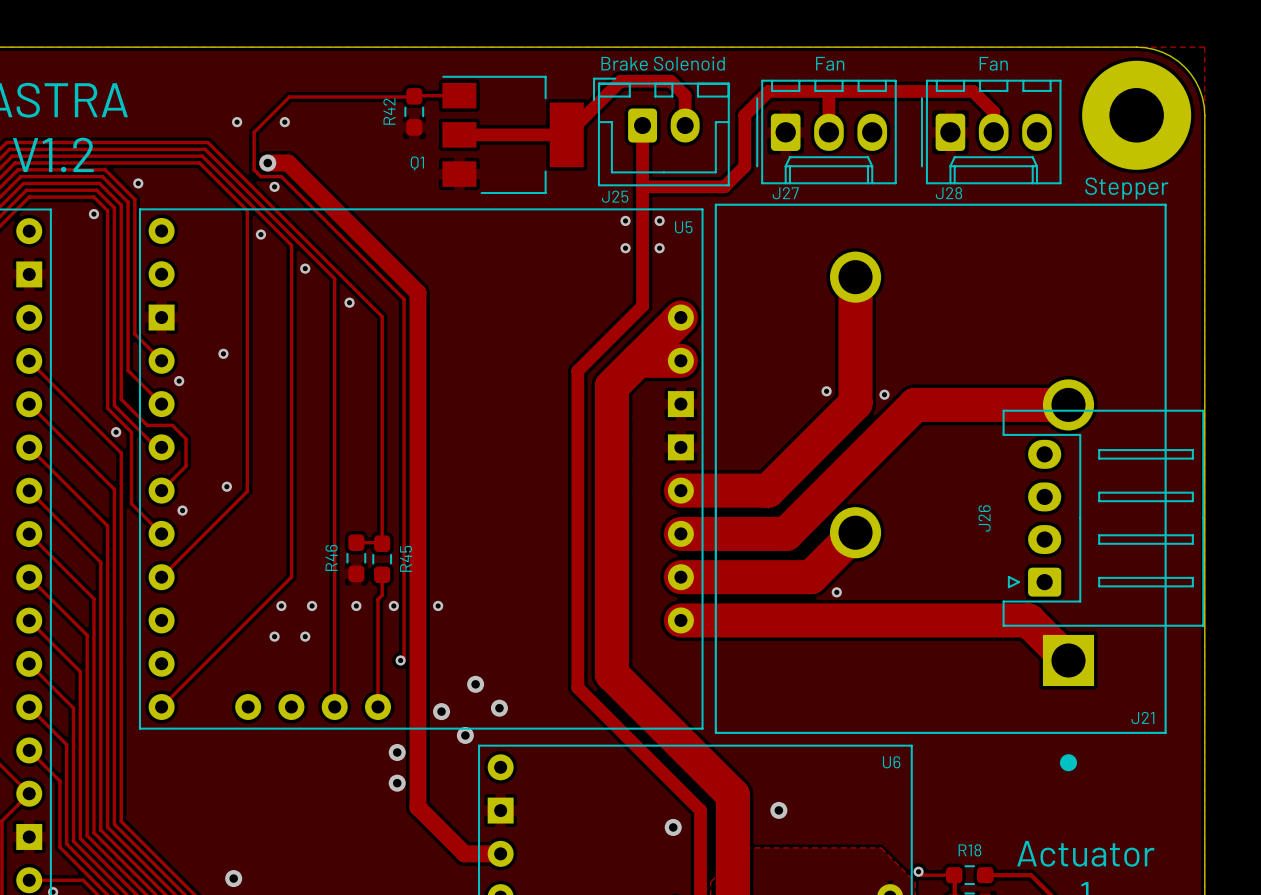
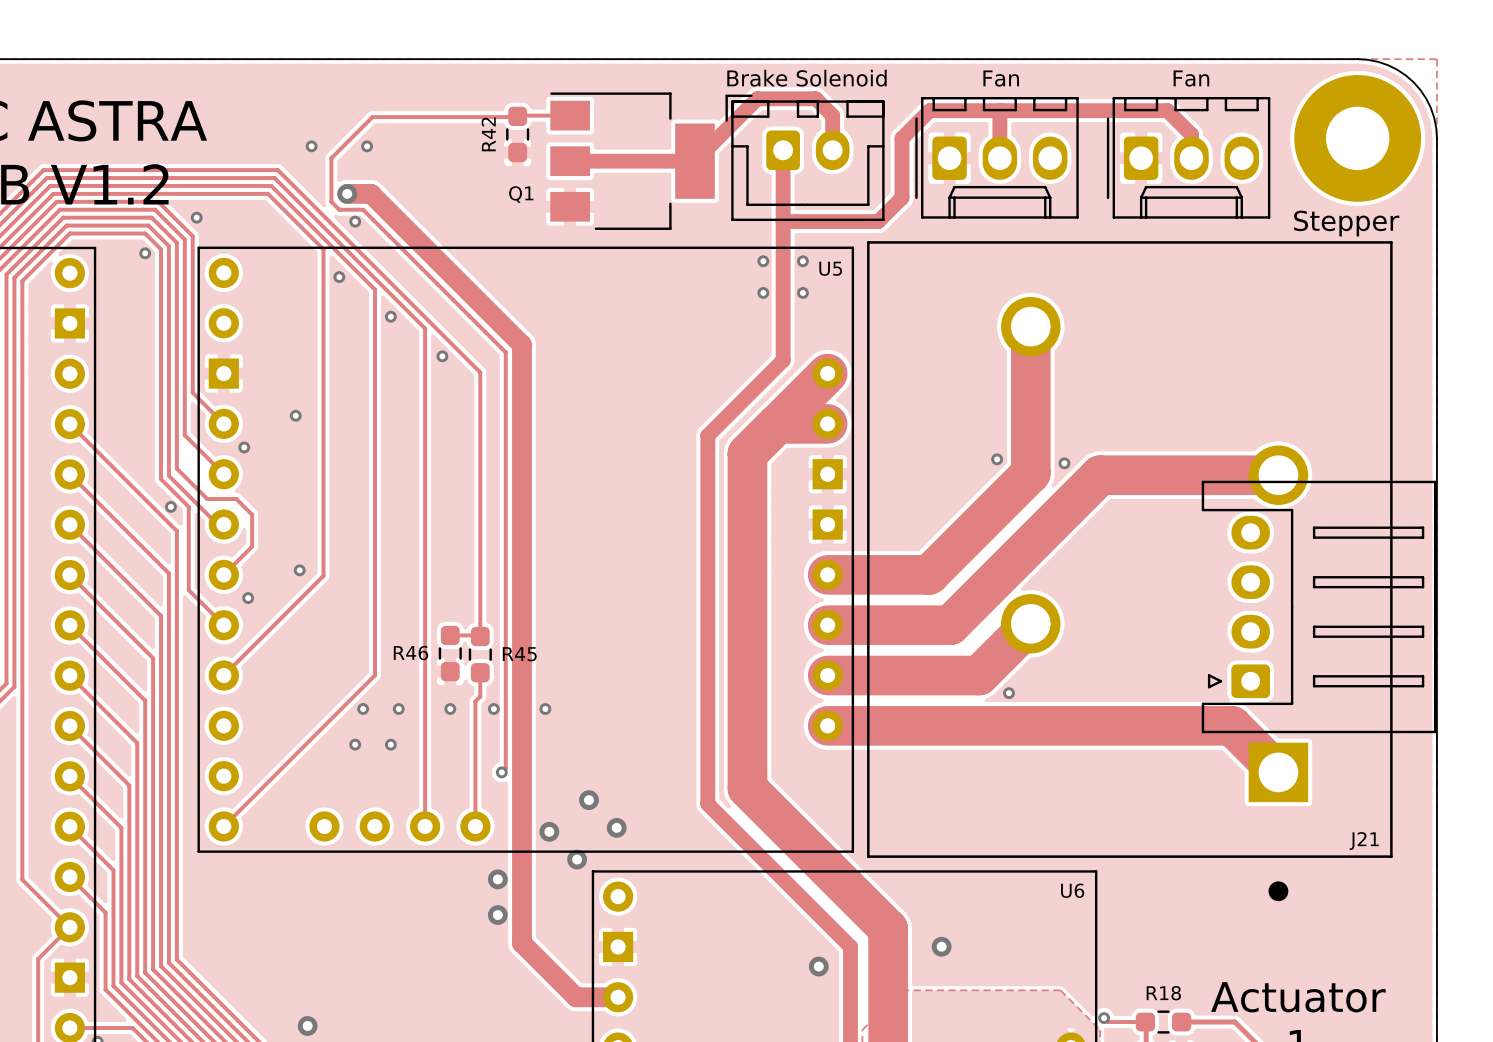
J27 name: J27 (785, 193) -> none
J28 name: J28 (948, 193) -> none
J25 name: J25 (615, 196) -> none
J26 name: J26 (984, 518) -> none
R46 name rotation: 0° (331, 557) -> 90° clockwise (411, 653)
R45 name rotation: 0° (406, 558) -> 90° clockwise (519, 654)

